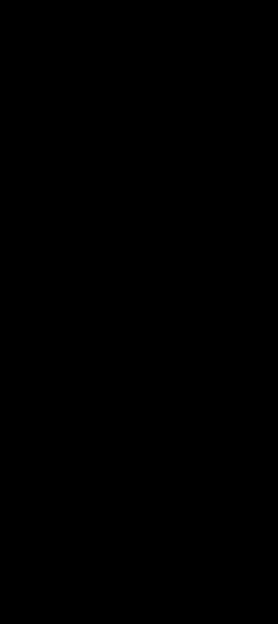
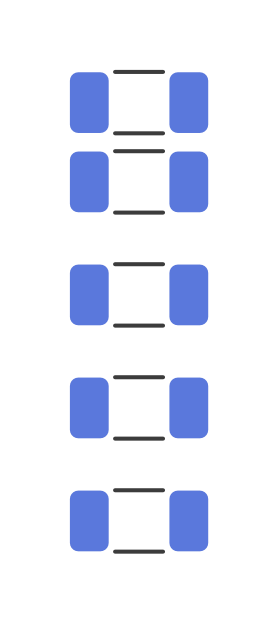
part: none -> (139, 102)
part: none -> (139, 181)
part: none -> (139, 294)
part: none -> (139, 407)
part: none -> (139, 520)

